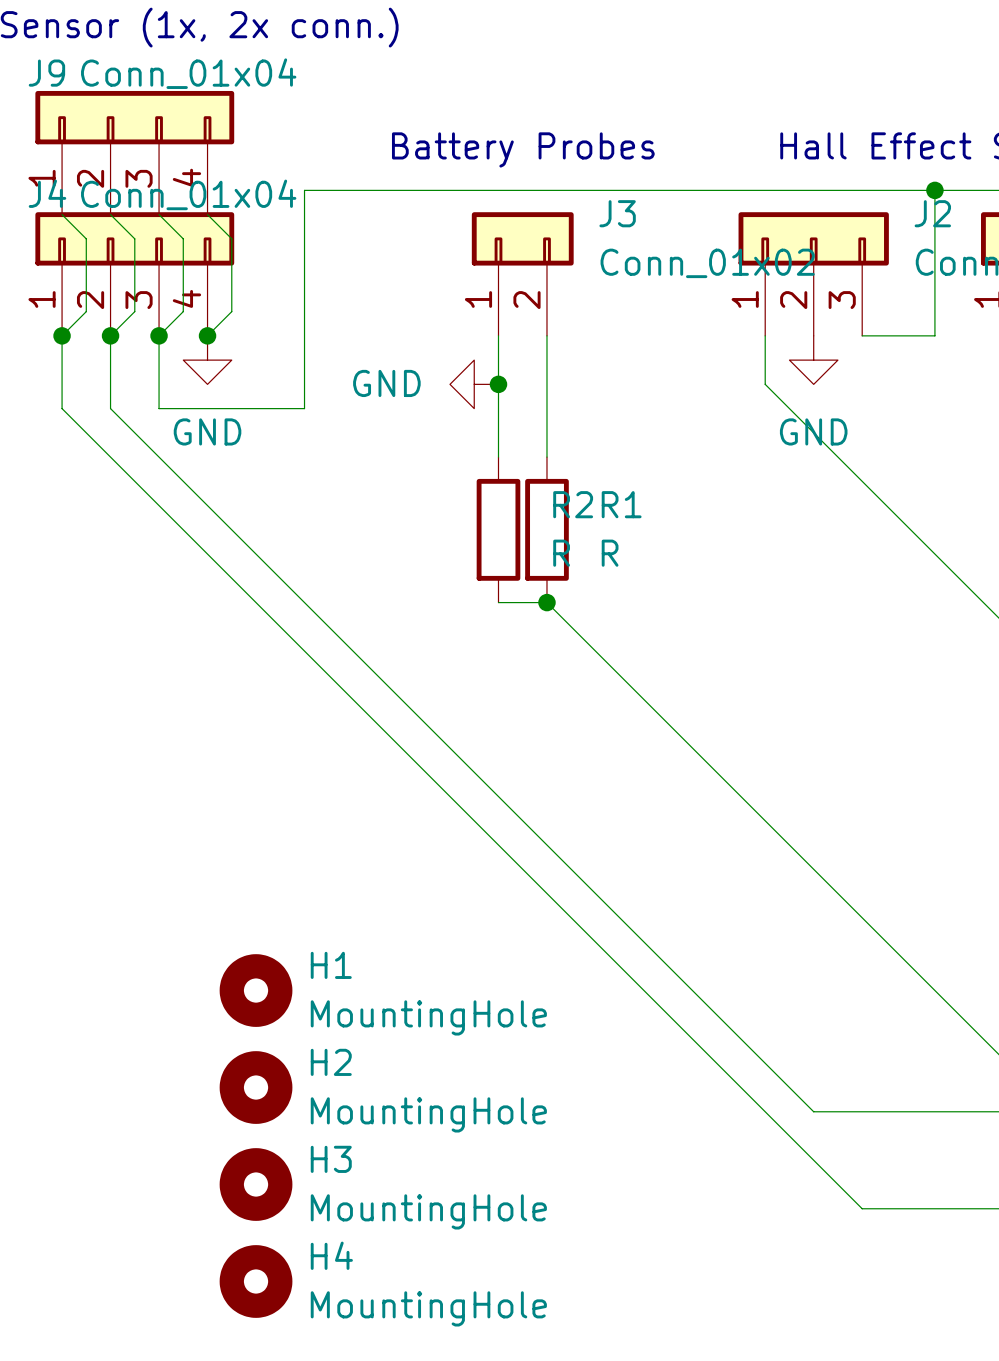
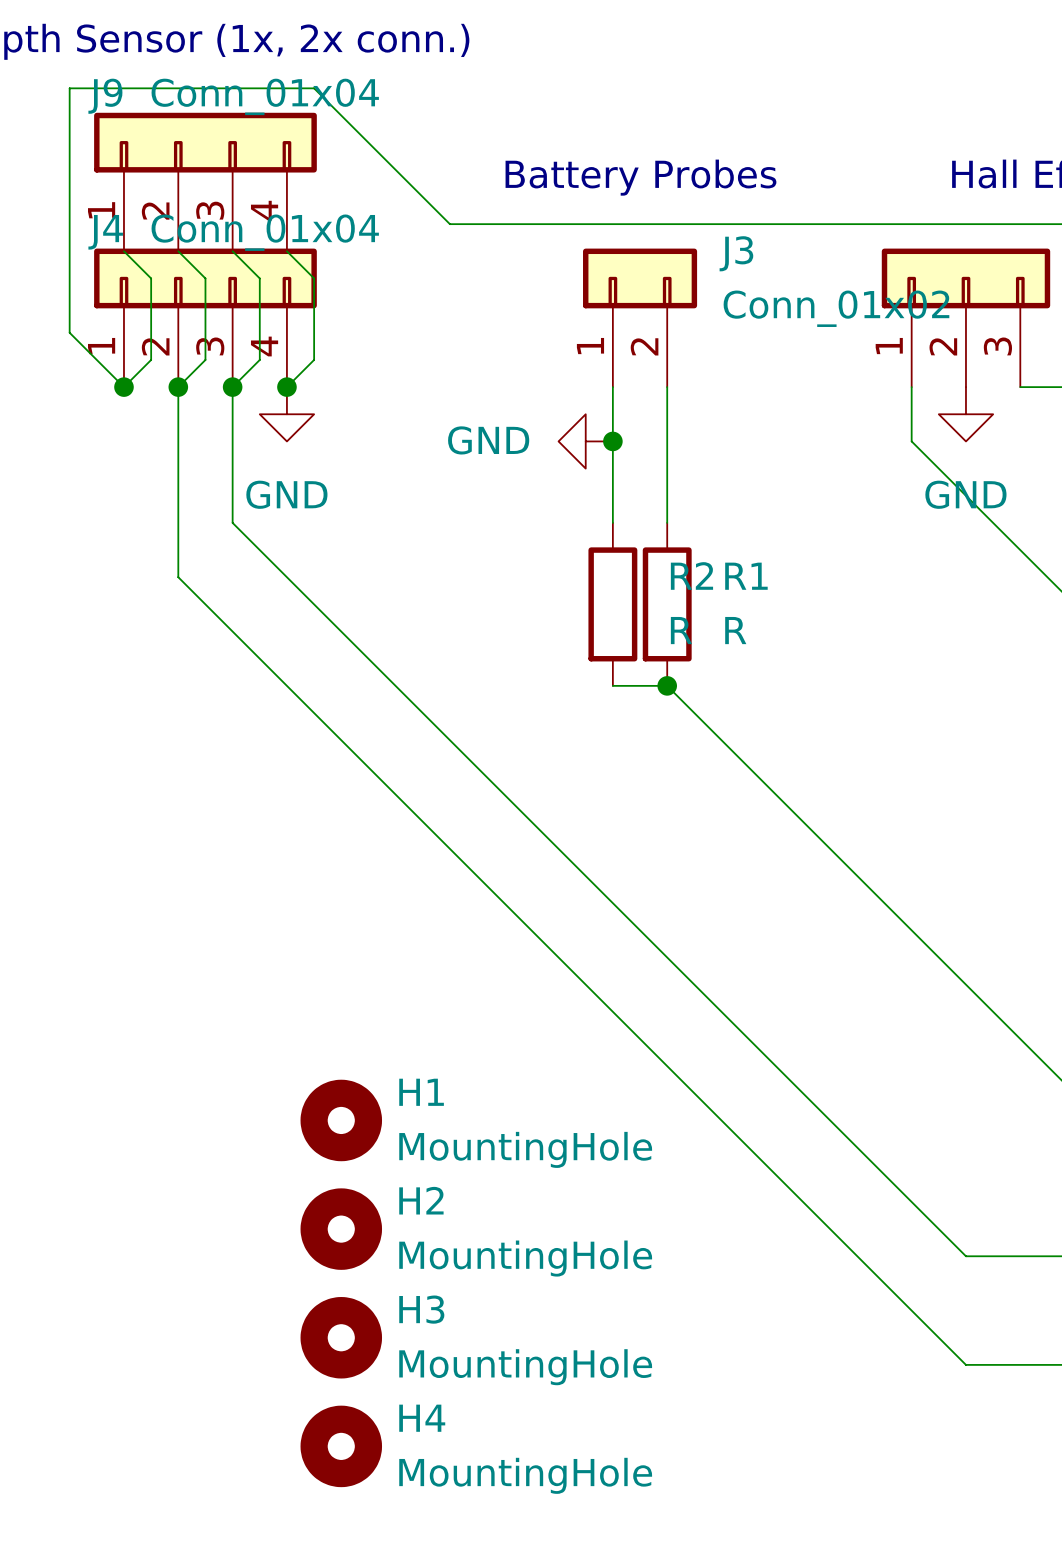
wire: (353, 190) (304, 190) (304, 408) (159, 408) -> (449, 224) (314, 88) (69, 88) (69, 332) (123, 387)
wire: (62, 335) (62, 408) (862, 1208) -> (178, 468) (178, 577) (965, 1364) (1020, 1364)
wire: (110, 408) (159, 457) -> (232, 468) (232, 522)

